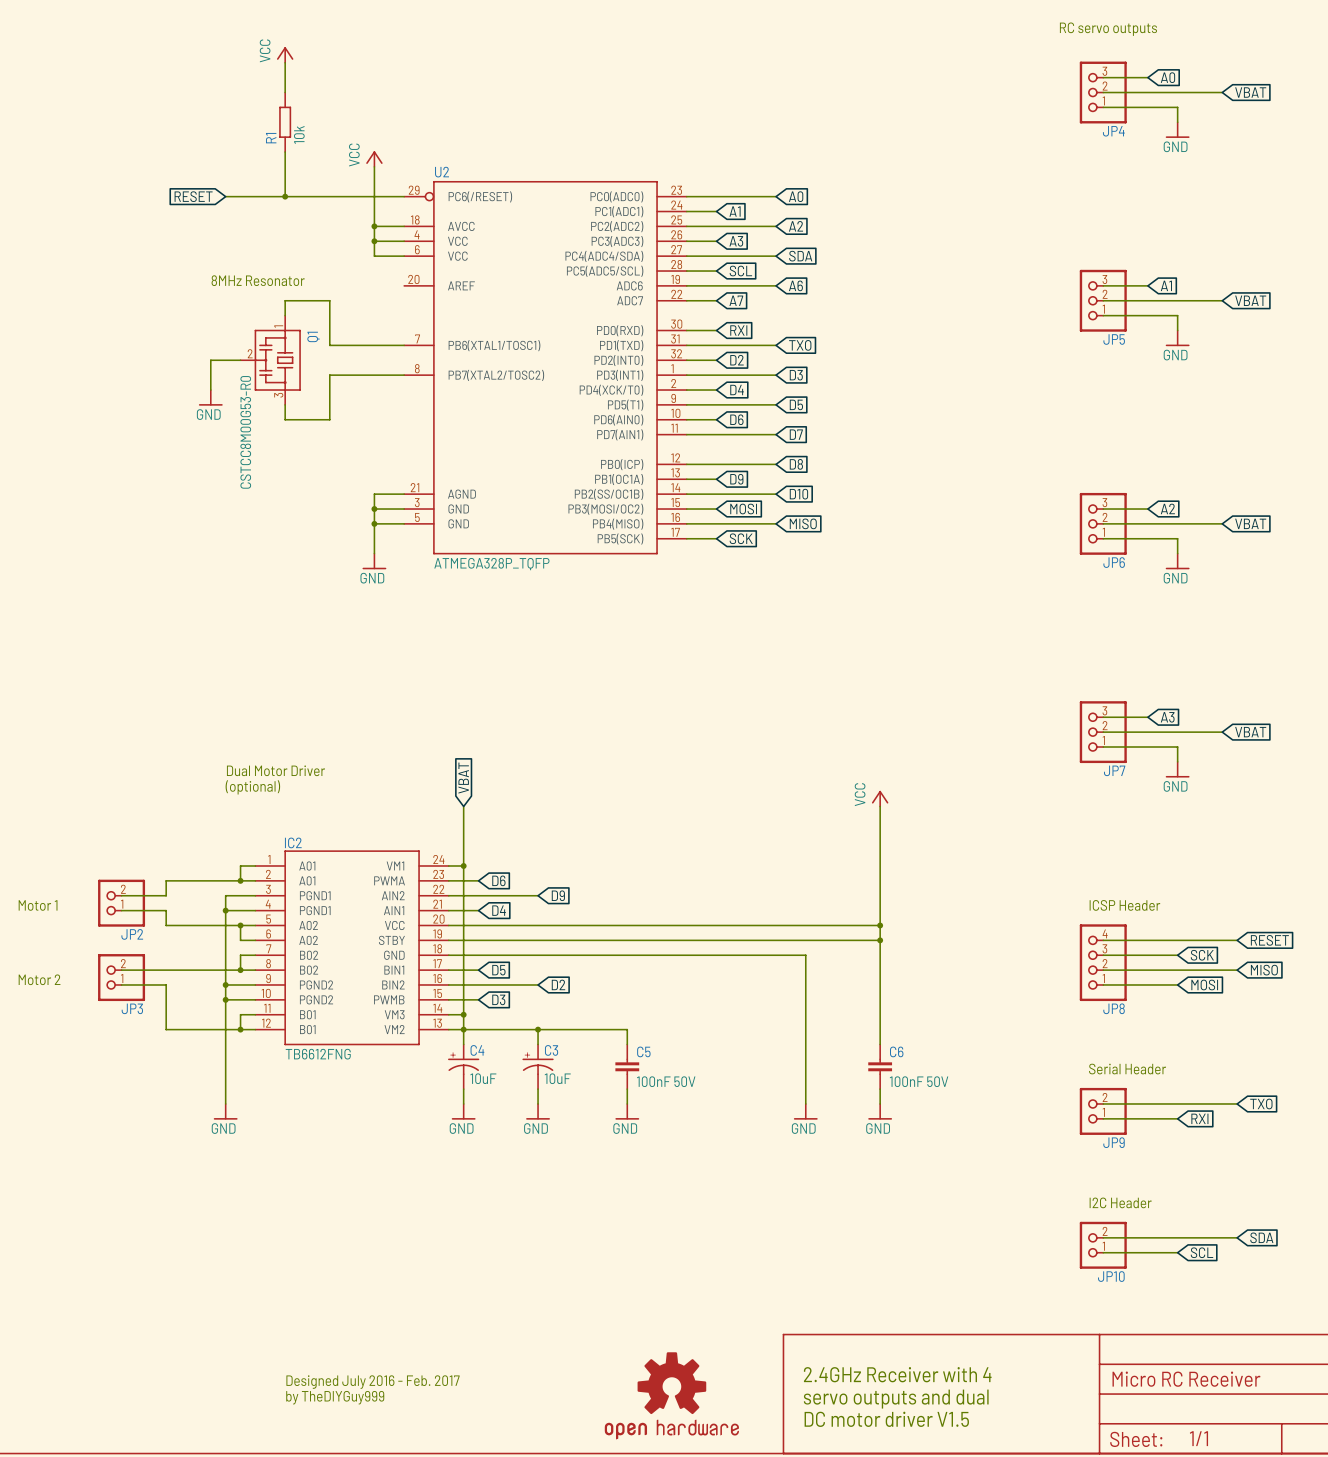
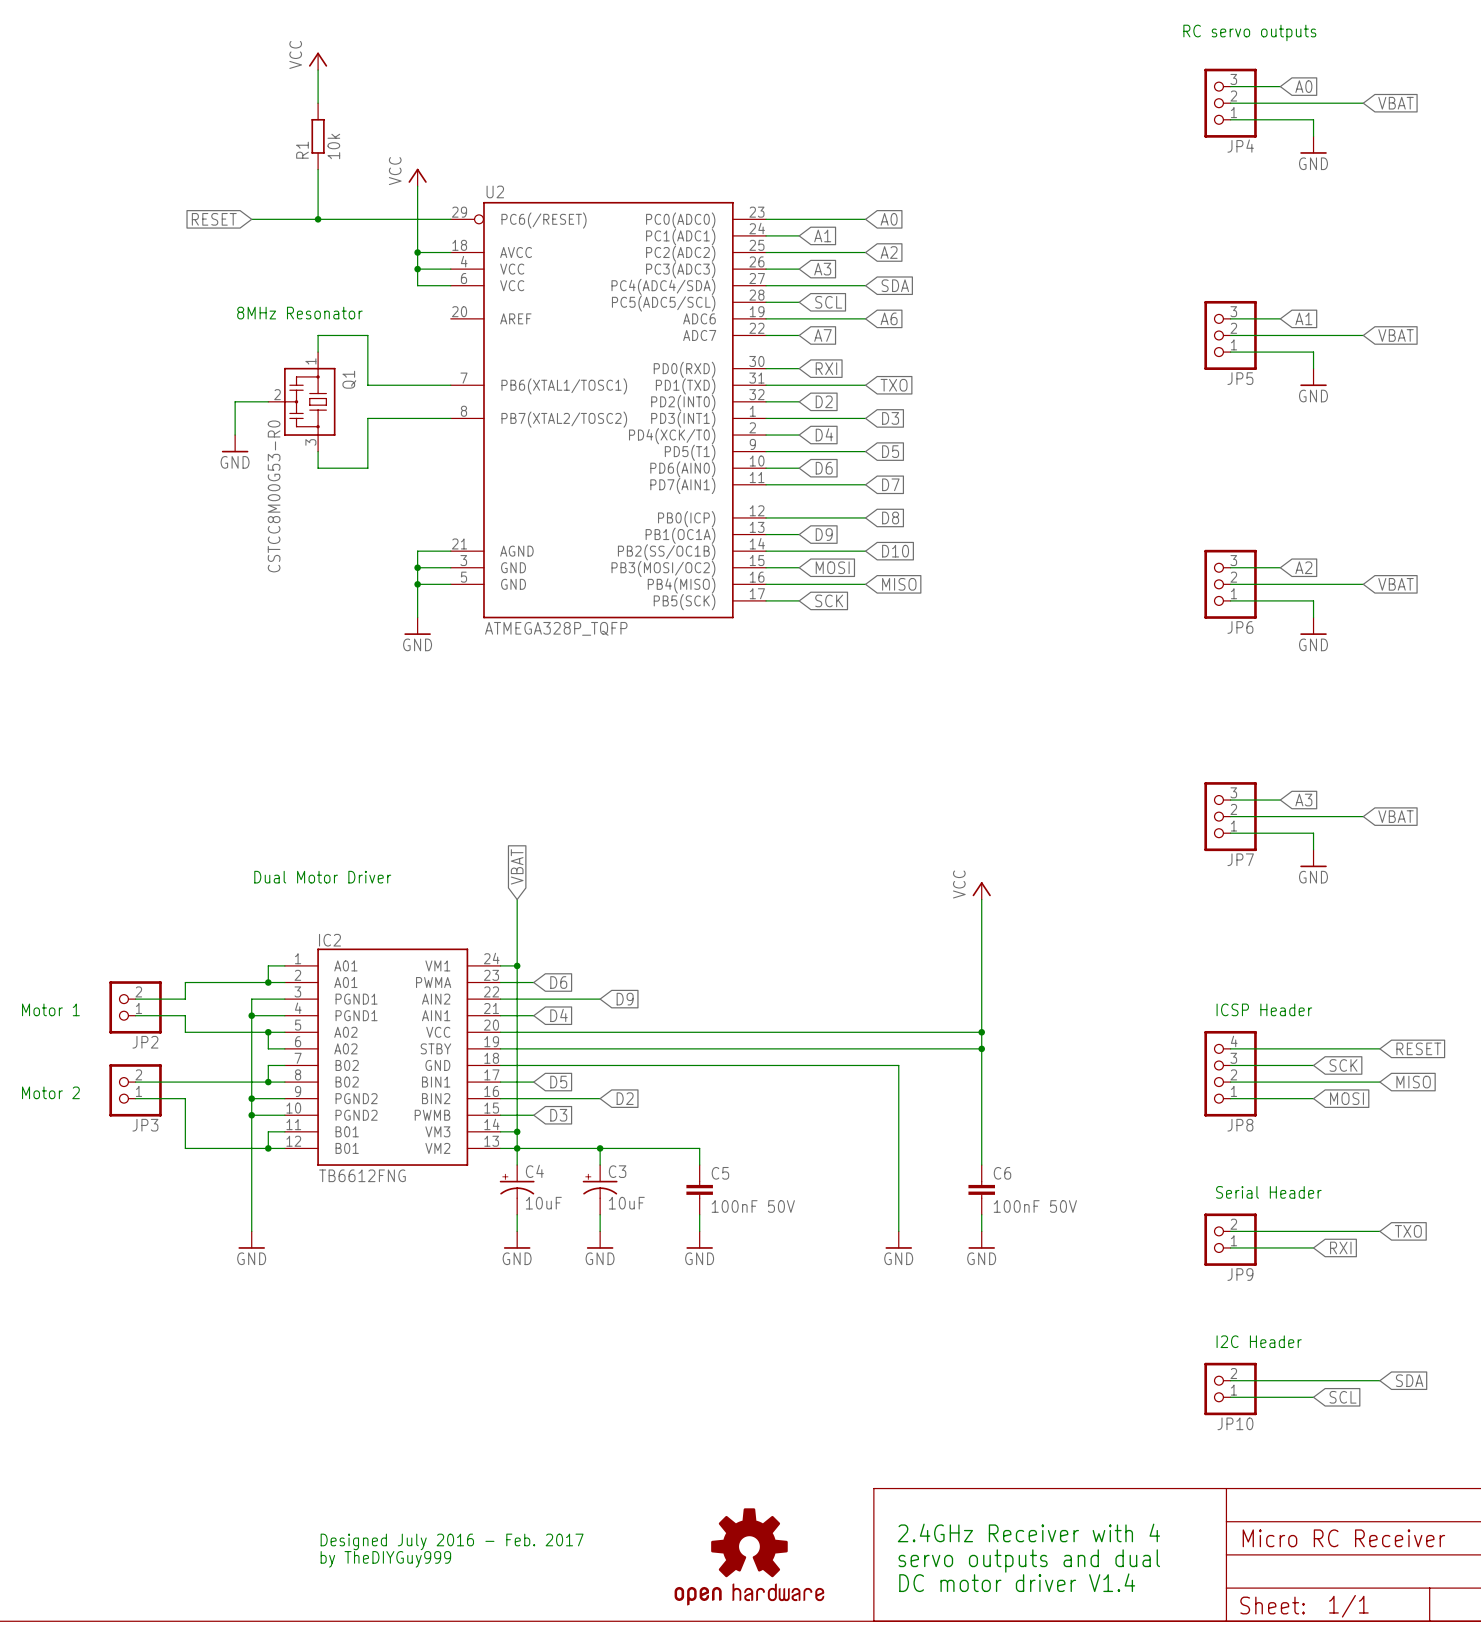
text: Dual Motor Driver (275, 770) -> none
text: (optional) (252, 787) -> Dual Motor Driver (322, 877)
text: DC motor driver V1.5 (886, 1419) -> DC motor driver V1.4 (1017, 1582)

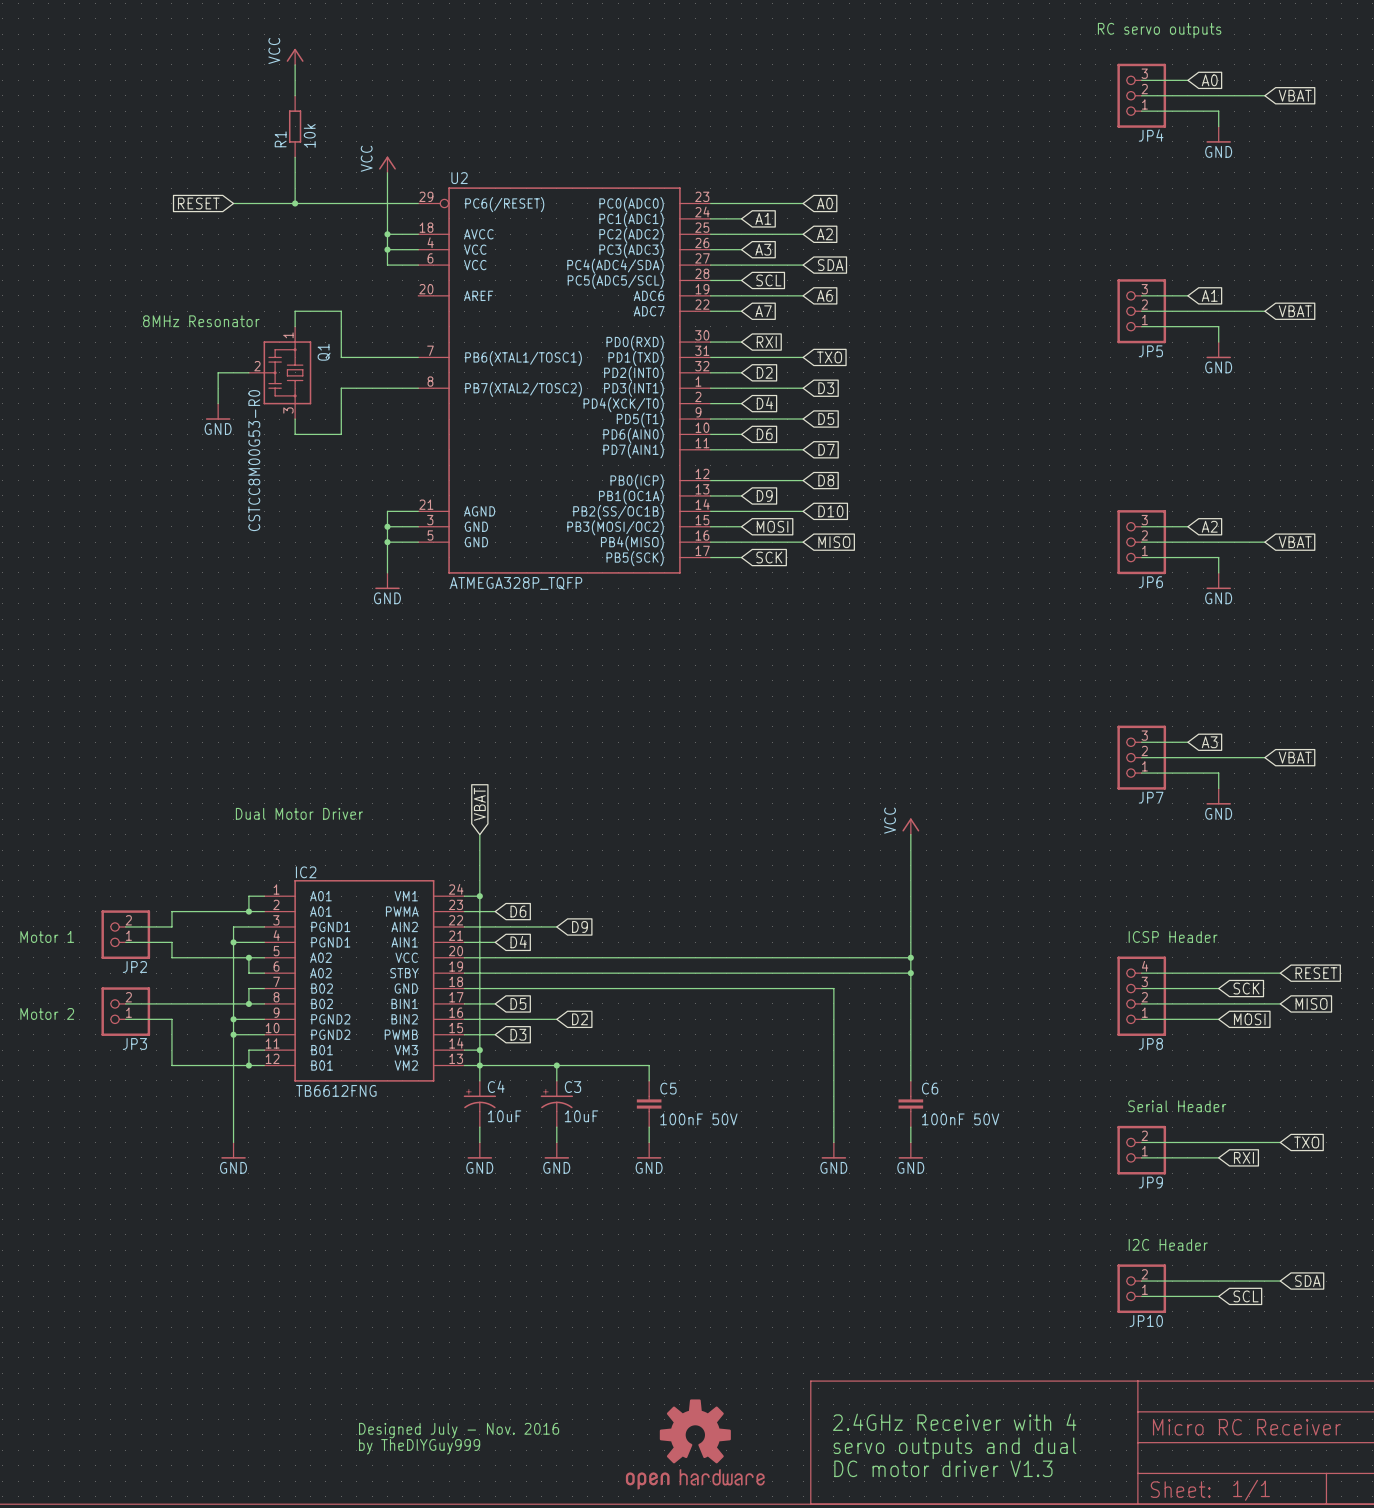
text position: 8MHz Resonator (299, 313) -> 8MHz Resonator (201, 321)
text: Designed July 2016 - Feb. 2017 (452, 1541) -> Designed July - Nov. 2016 (459, 1430)
text position: by TheDIYGuy999 (385, 1559) -> by TheDIYGuy999 (419, 1446)
text: DC motor driver V1.4 (1017, 1582) -> DC motor driver V1.3 (943, 1468)

